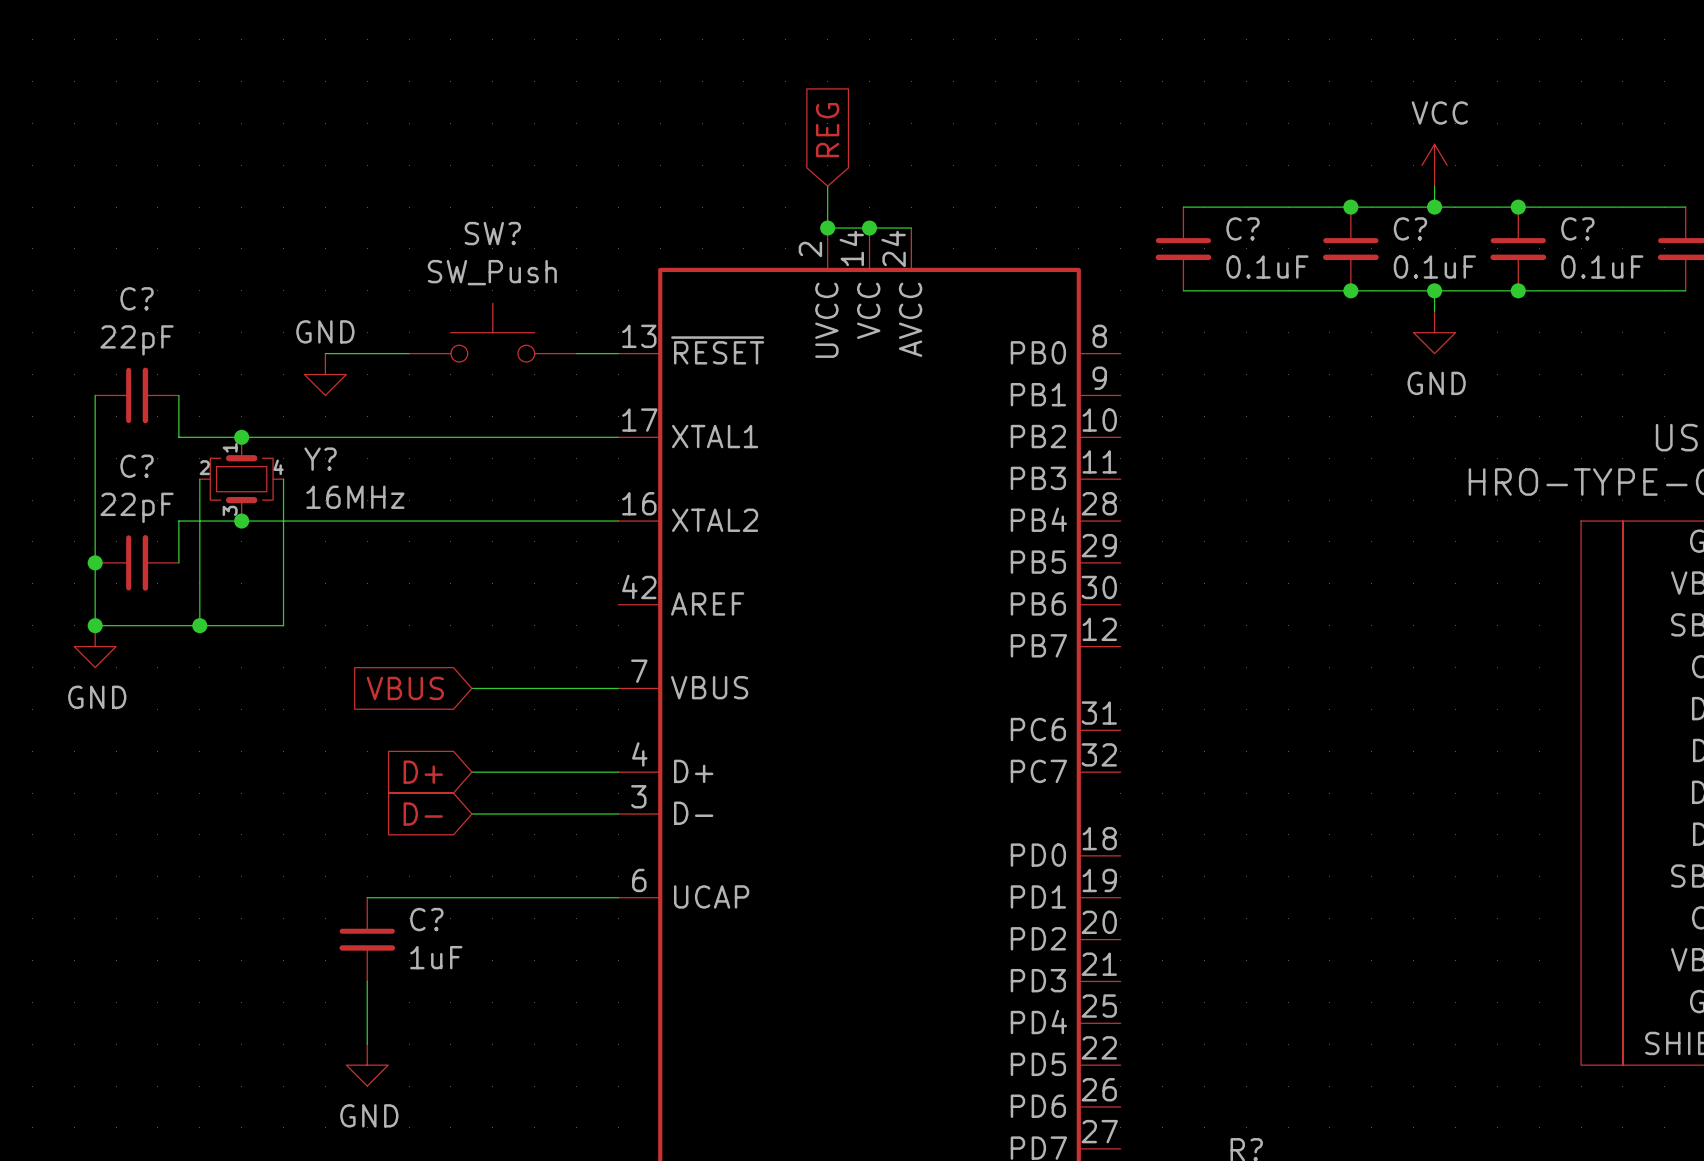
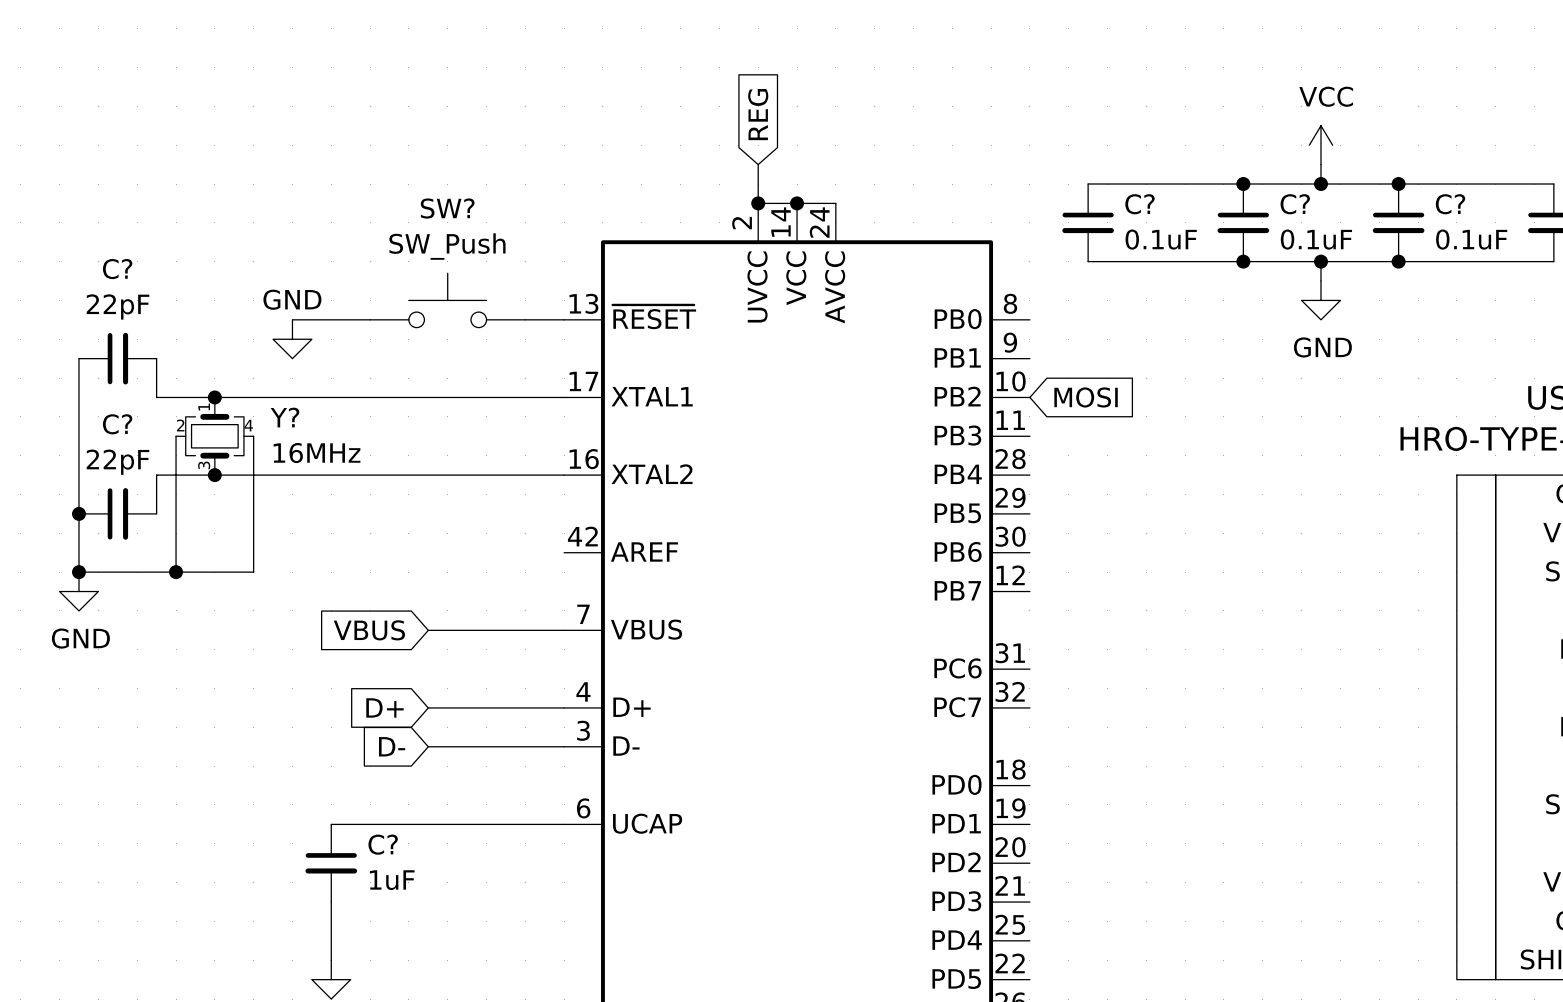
global label: none -> MOSI (1086, 397)

